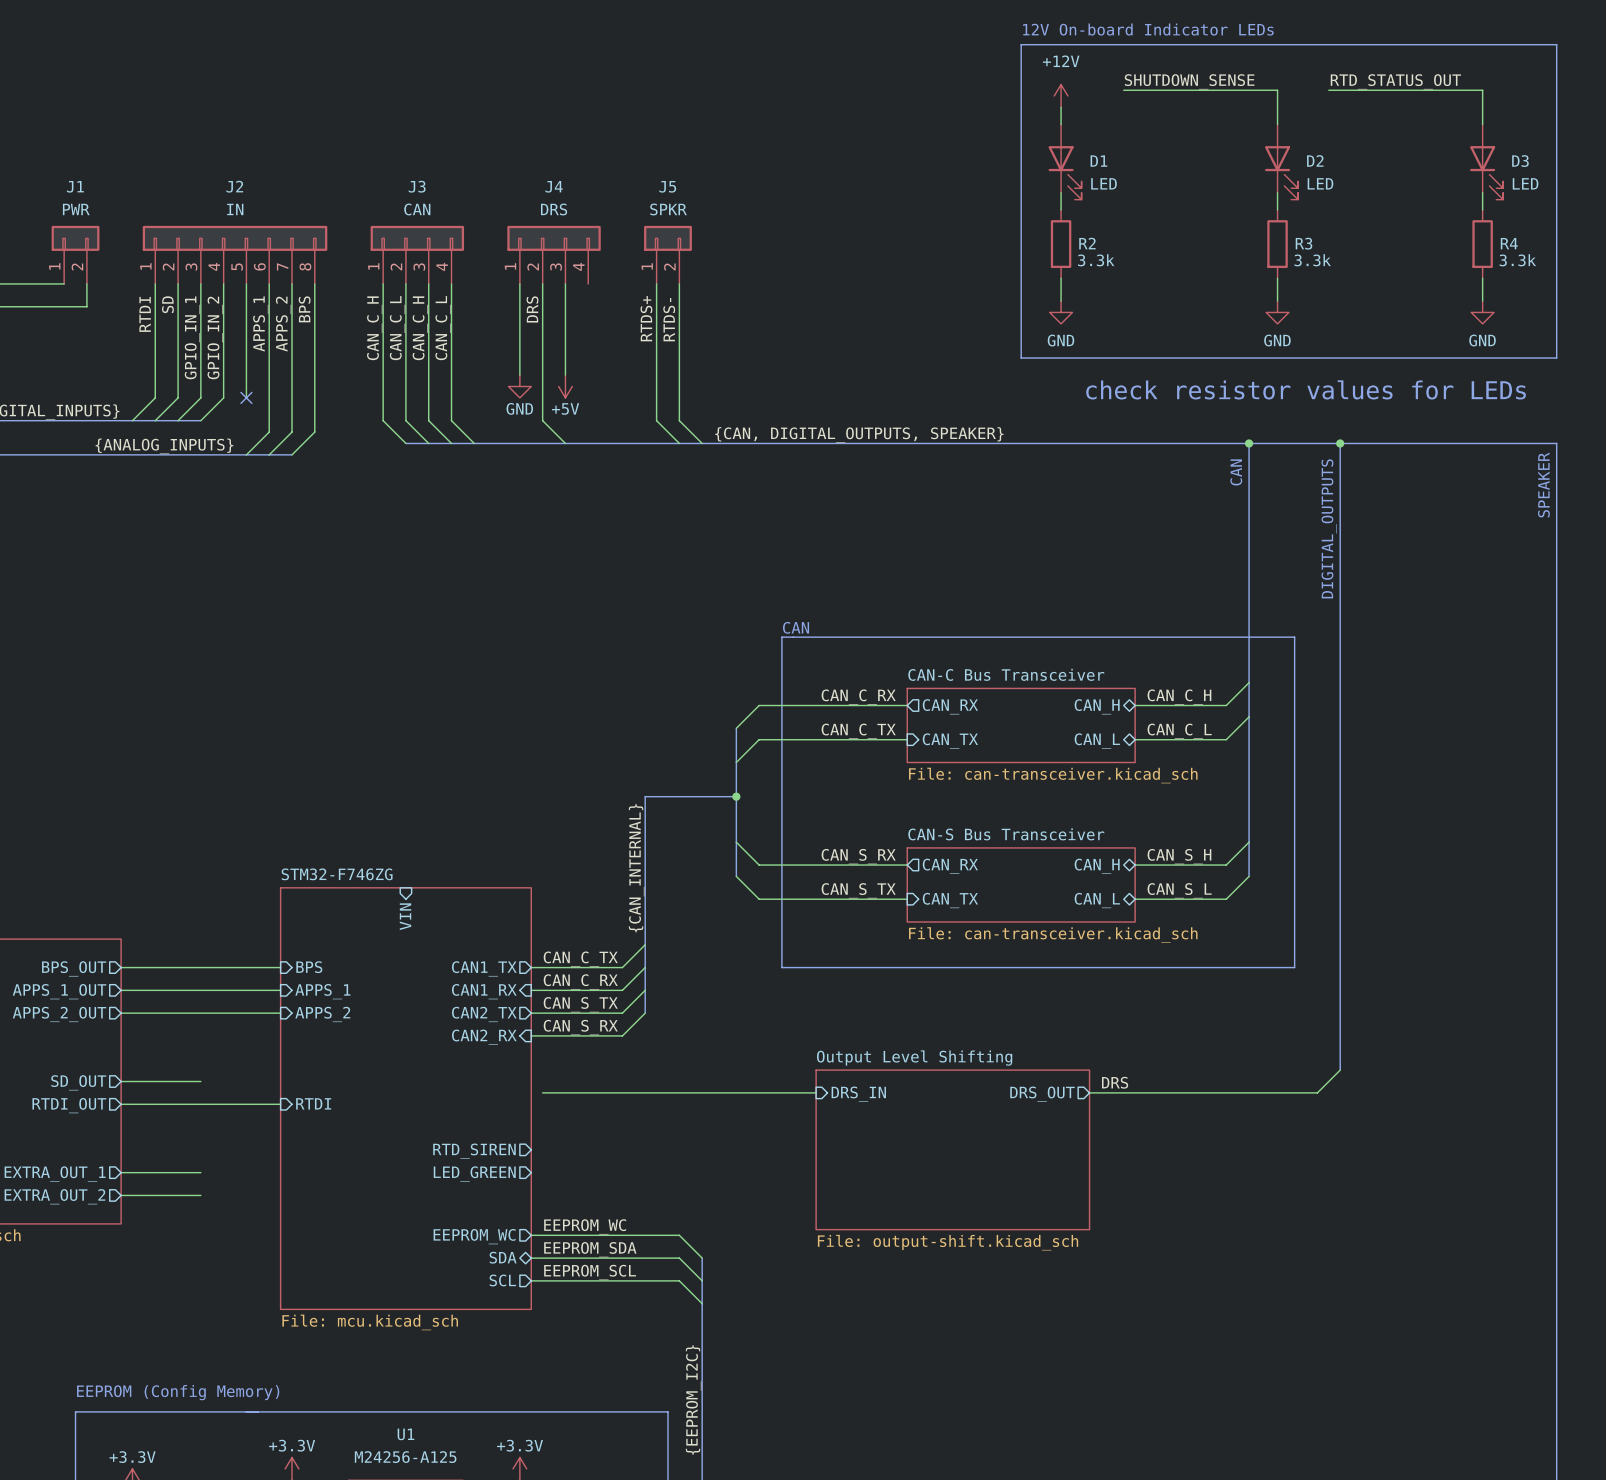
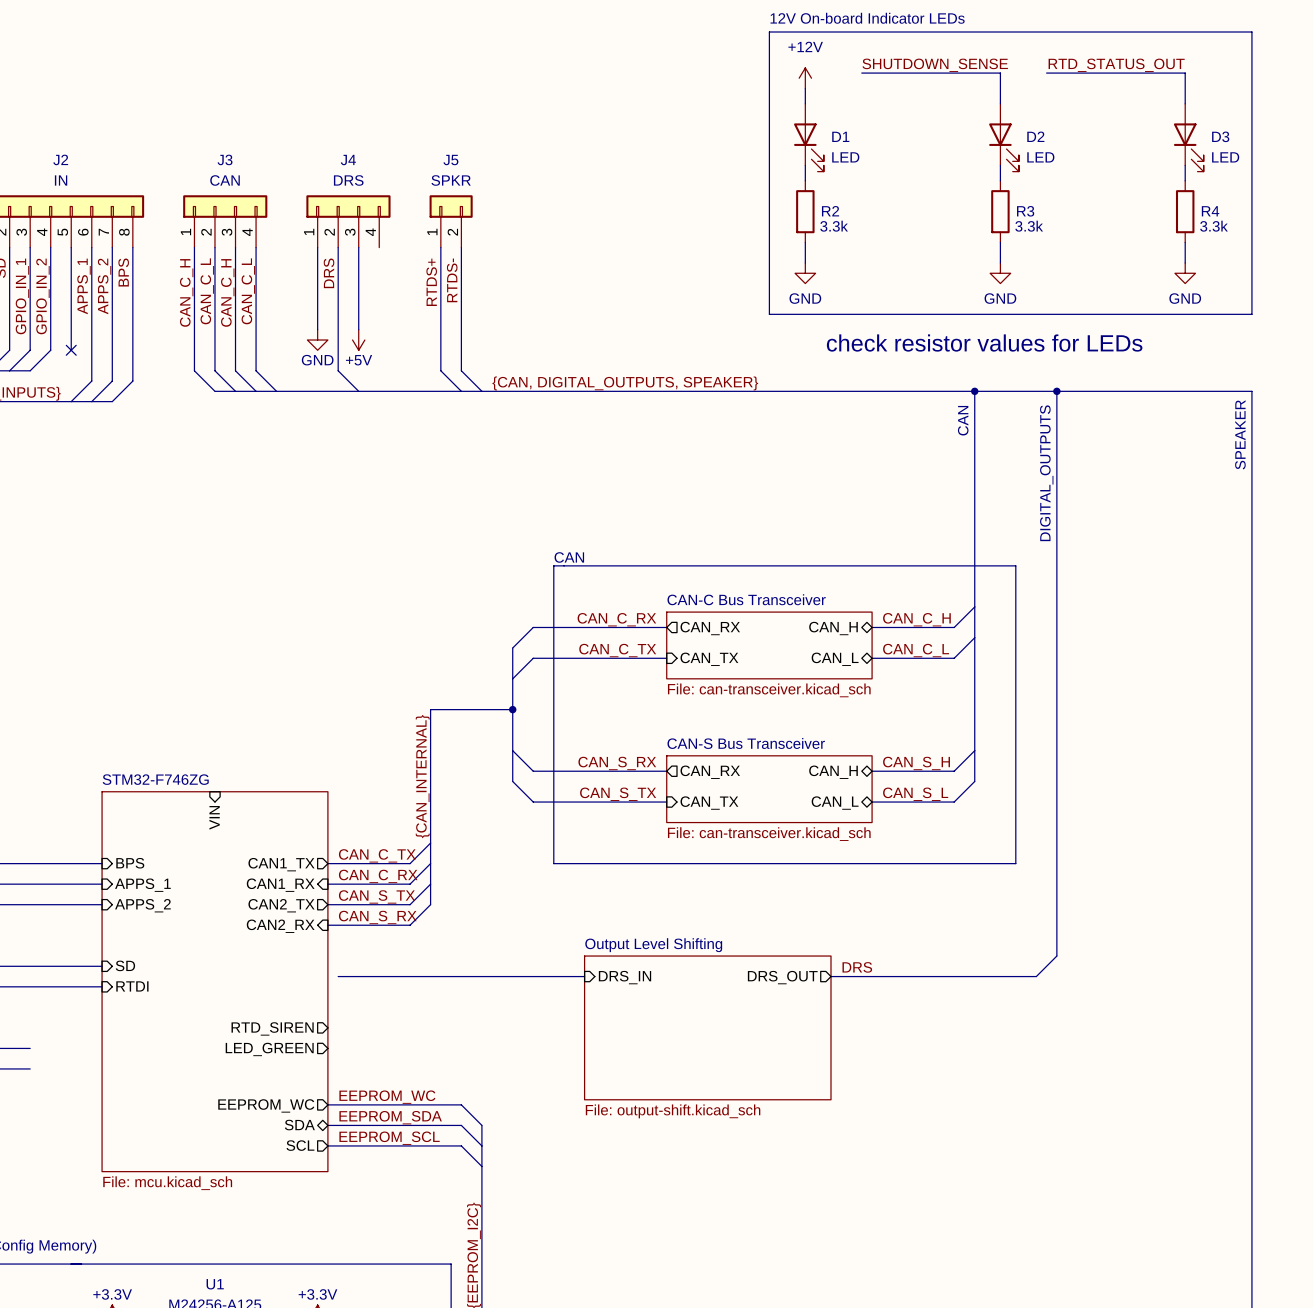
wire: none -> (30, 966) (102, 966)
sheet pin: none -> SD (125, 965)

